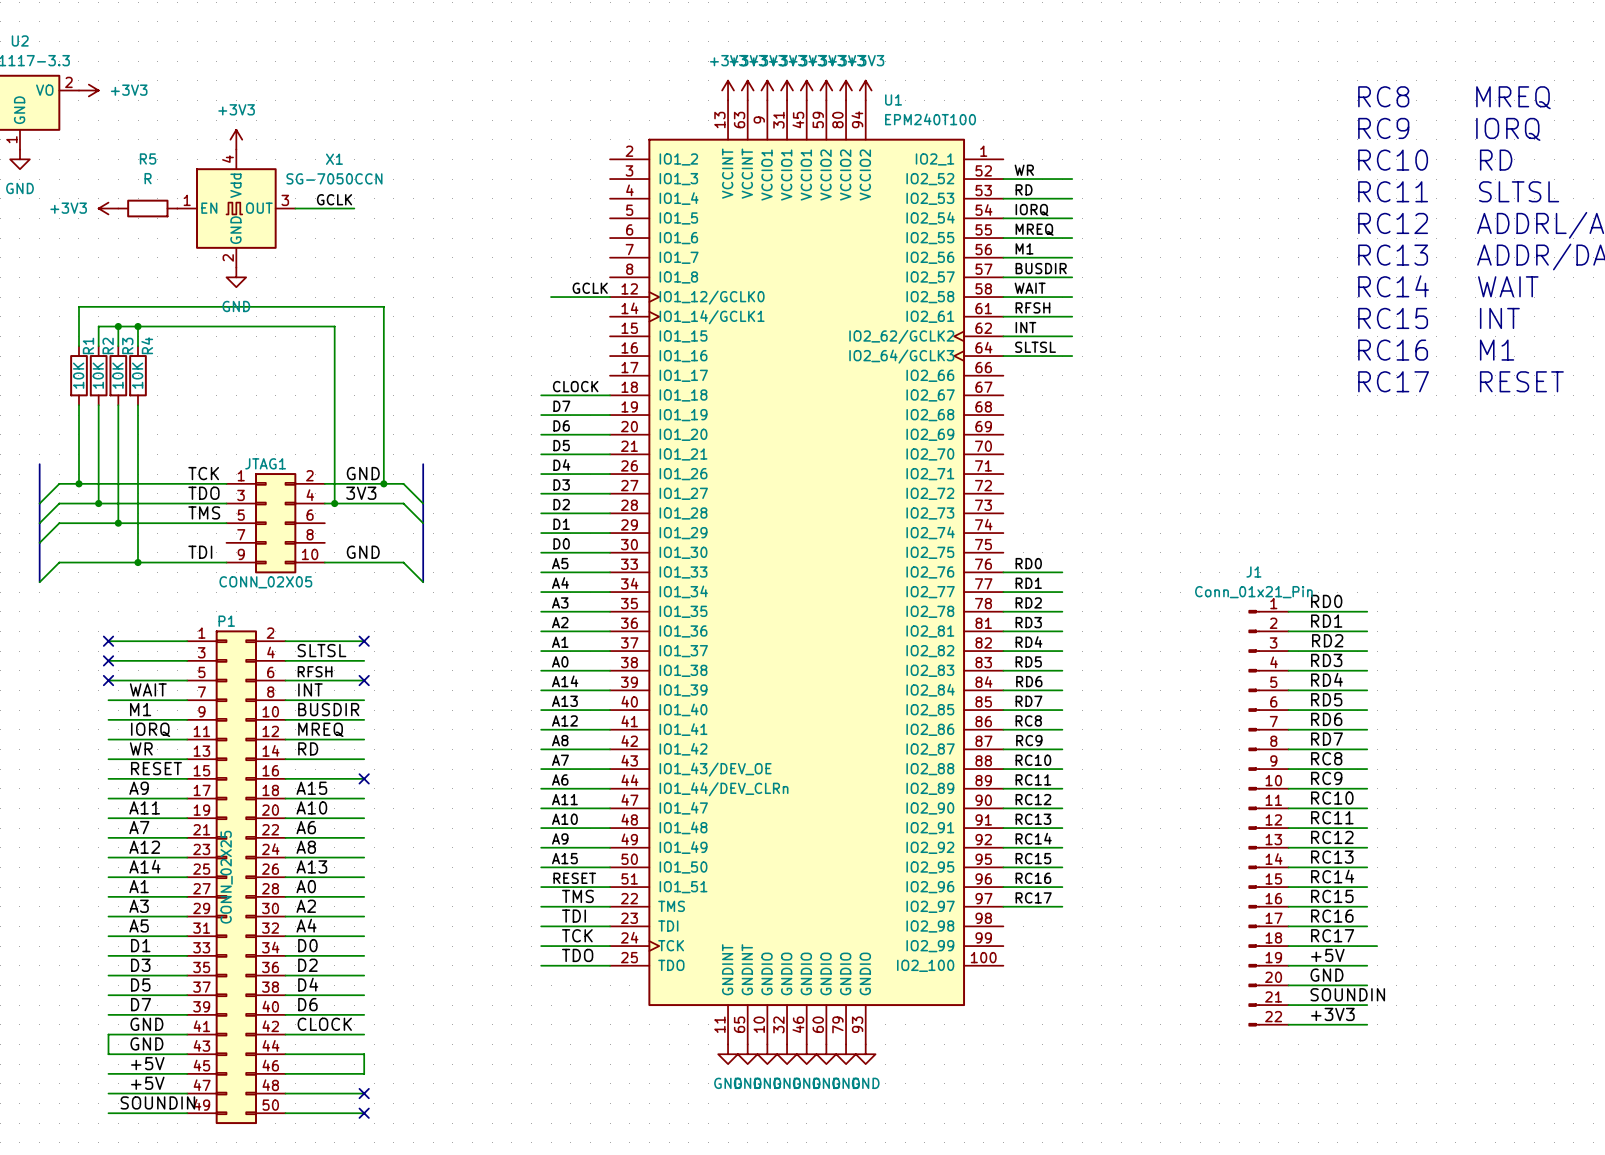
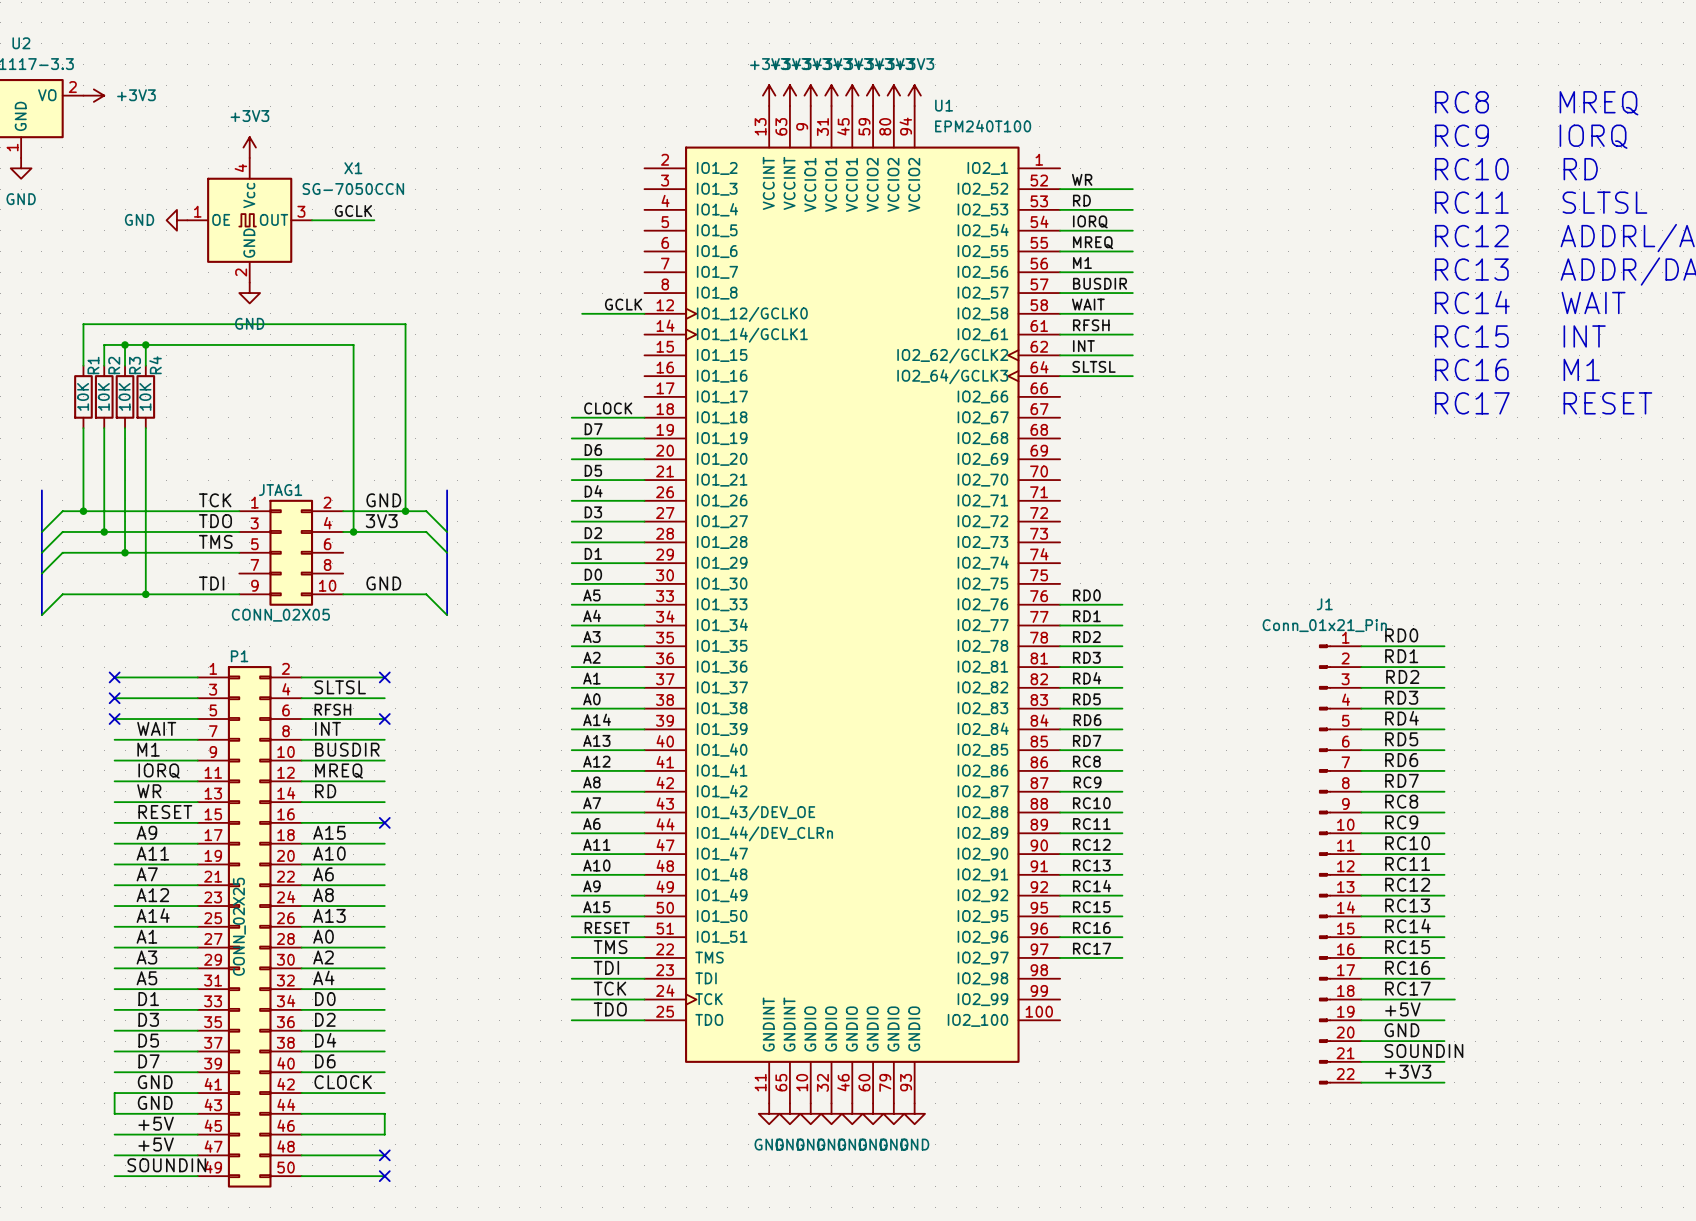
X1 pin name: Vdd (235, 185) -> Vcc (249, 195)
power symbol: +3V3 (108, 208) -> none
R5: R (147, 208) -> none
power symbol: none -> GND (176, 220)
X1 pin name: EN (209, 208) -> OE (221, 219)

